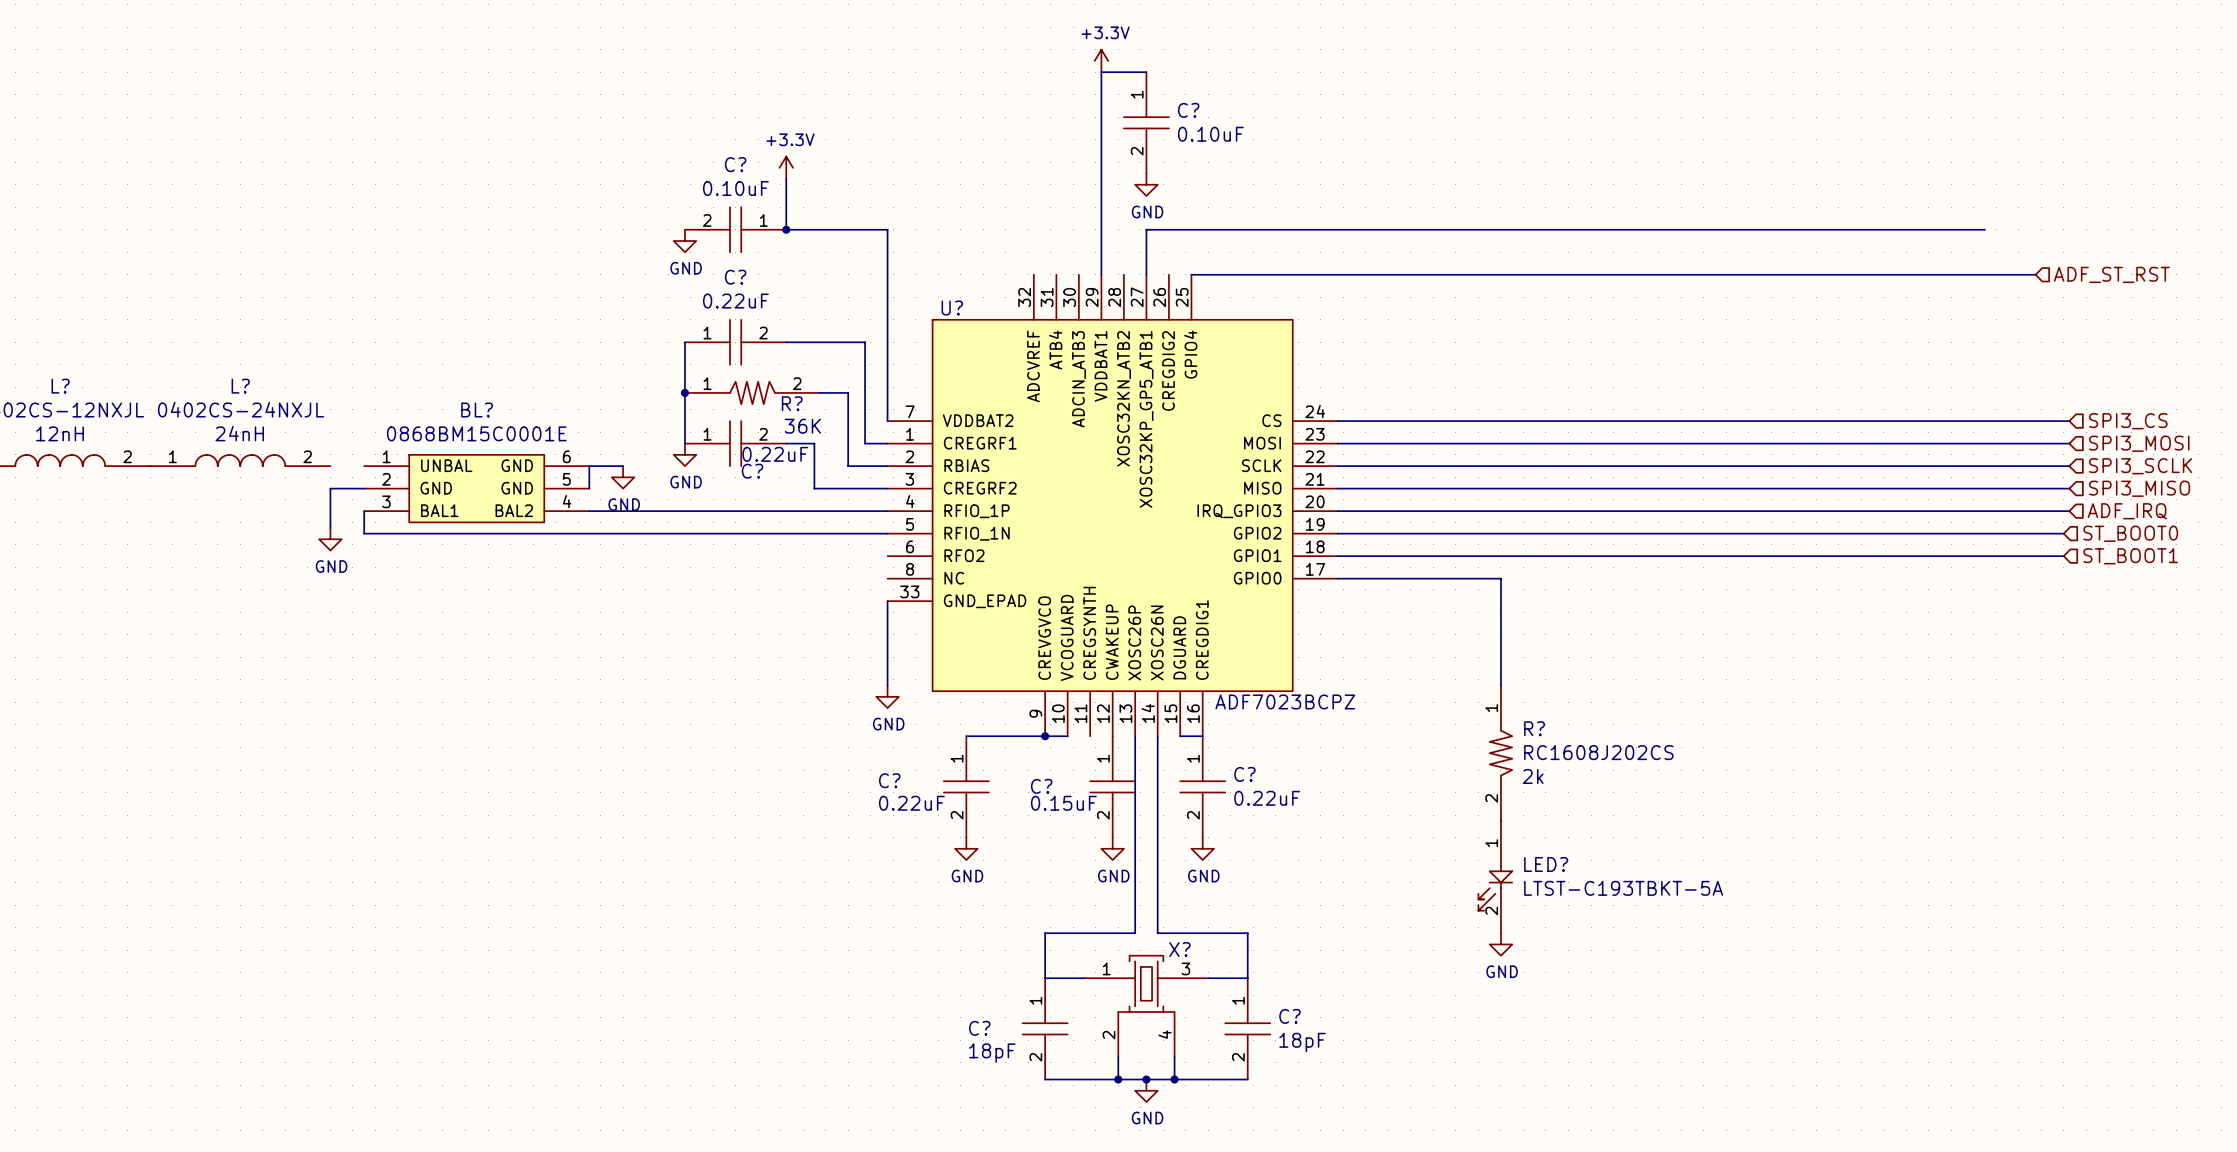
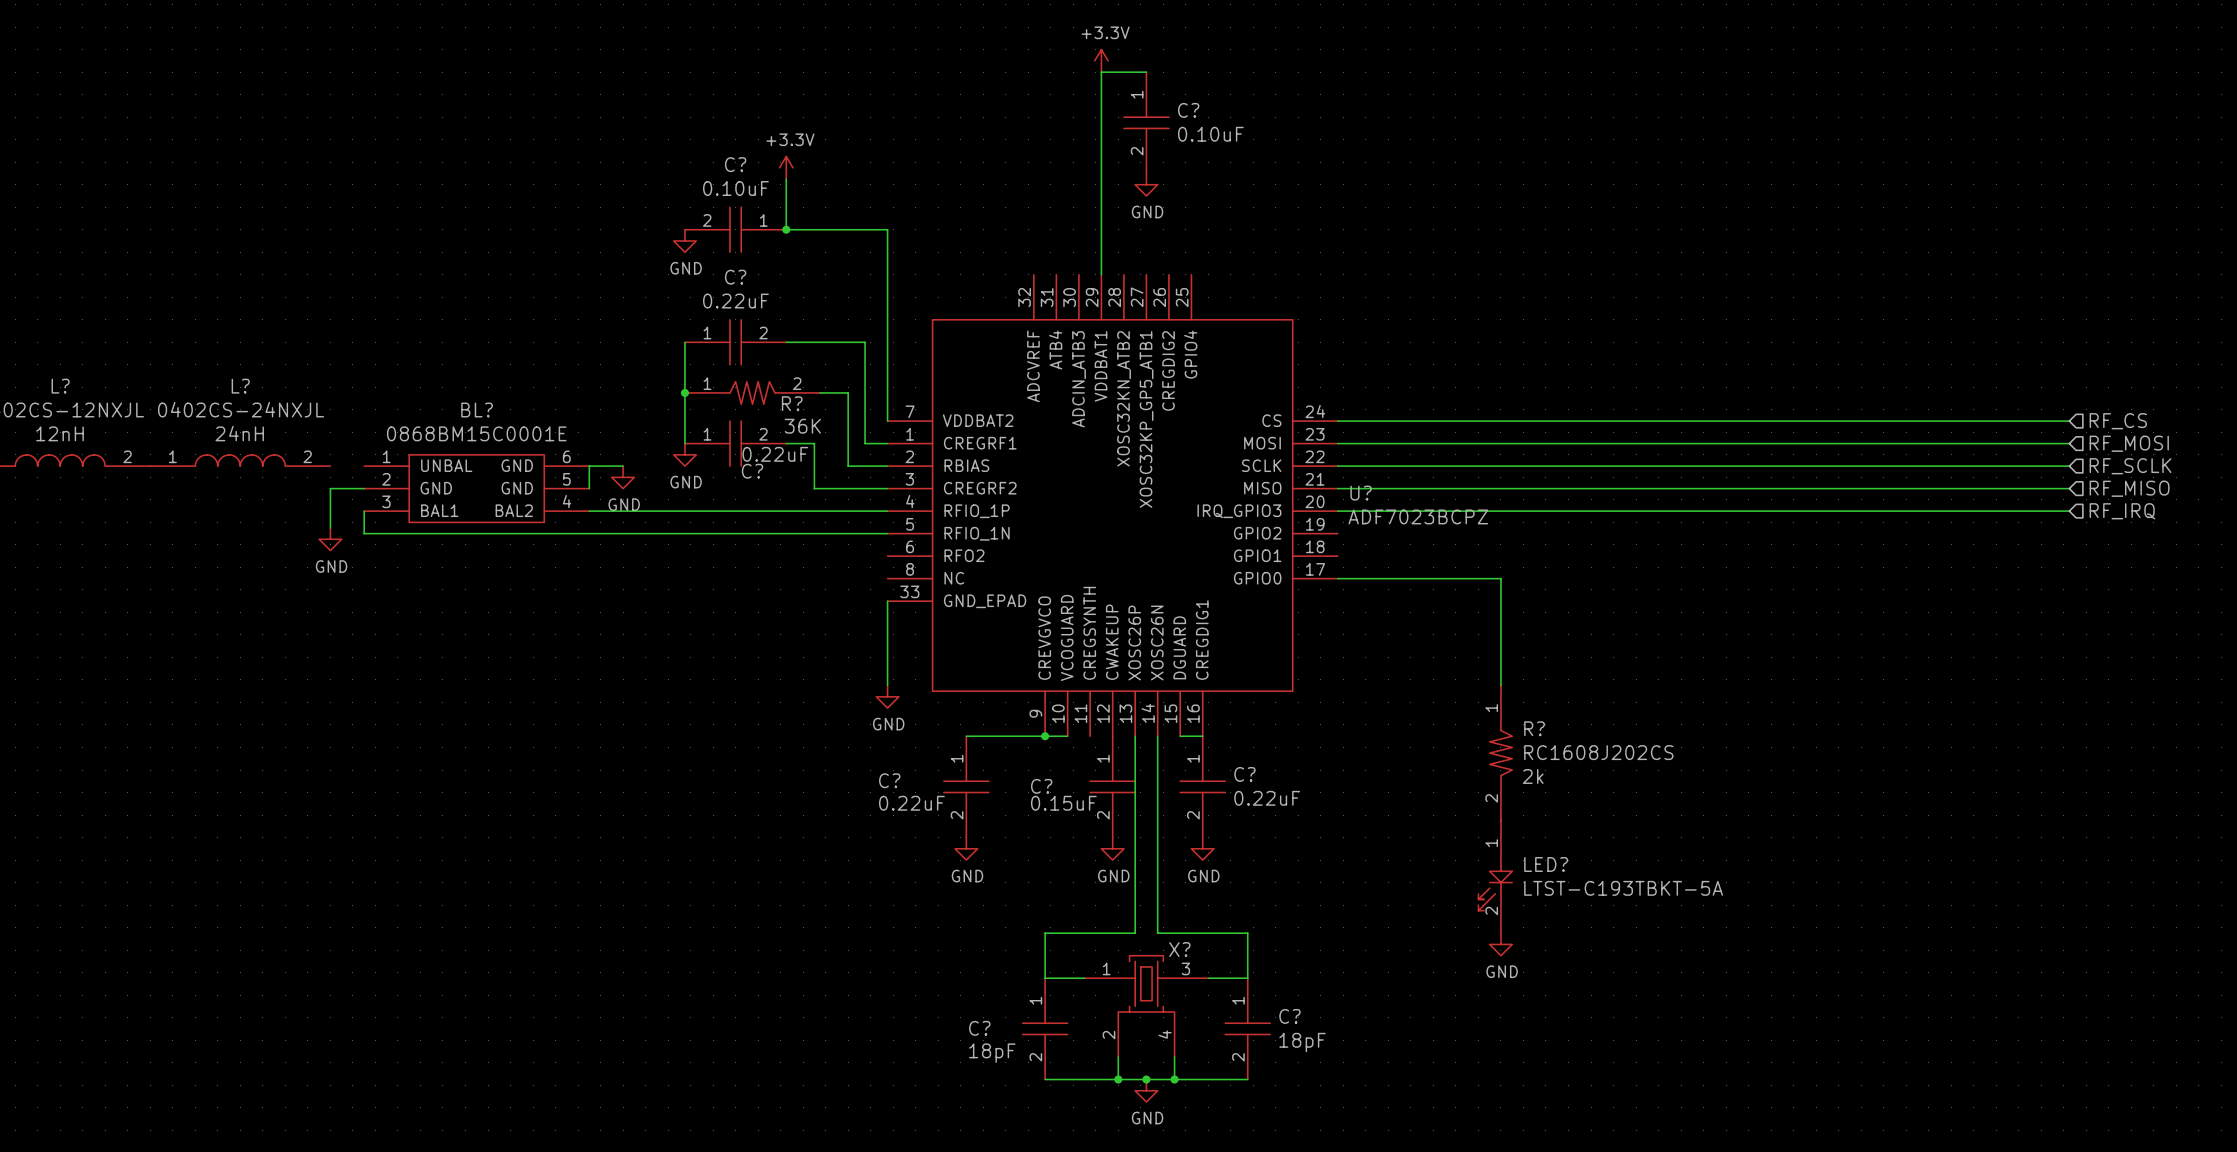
wire: (1984, 229) (1146, 229) (1146, 274) -> none
wire: (1191, 274) (2035, 274) -> none
hierarchical label: ADF_ST_RST (2111, 274) -> none
U? name position: U? (952, 308) -> U? (1361, 493)
hierarchical label: SPI3_CS (2128, 421) -> RF_CS (2118, 421)
hierarchical label: SPI3_MOSI (2139, 443) -> RF_MOSI (2129, 443)
hierarchical label: SPI3_SCLK (2140, 466) -> RF_SCLK (2130, 466)
hierarchical label: SPI3_MISO (2139, 488) -> RF_MISO (2129, 488)
hierarchical label: ADF_IRQ (2127, 511) -> RF_IRQ (2122, 511)
wire: (1337, 533) (2063, 533) -> none
hierarchical label: ST_BOOT0 (2130, 533) -> none
wire: (1337, 556) (2063, 556) -> none
hierarchical label: ST_BOOT1 (2130, 556) -> none
U? value position: ADF7023BCPZ (1285, 701) -> ADF7023BCPZ (1418, 516)

